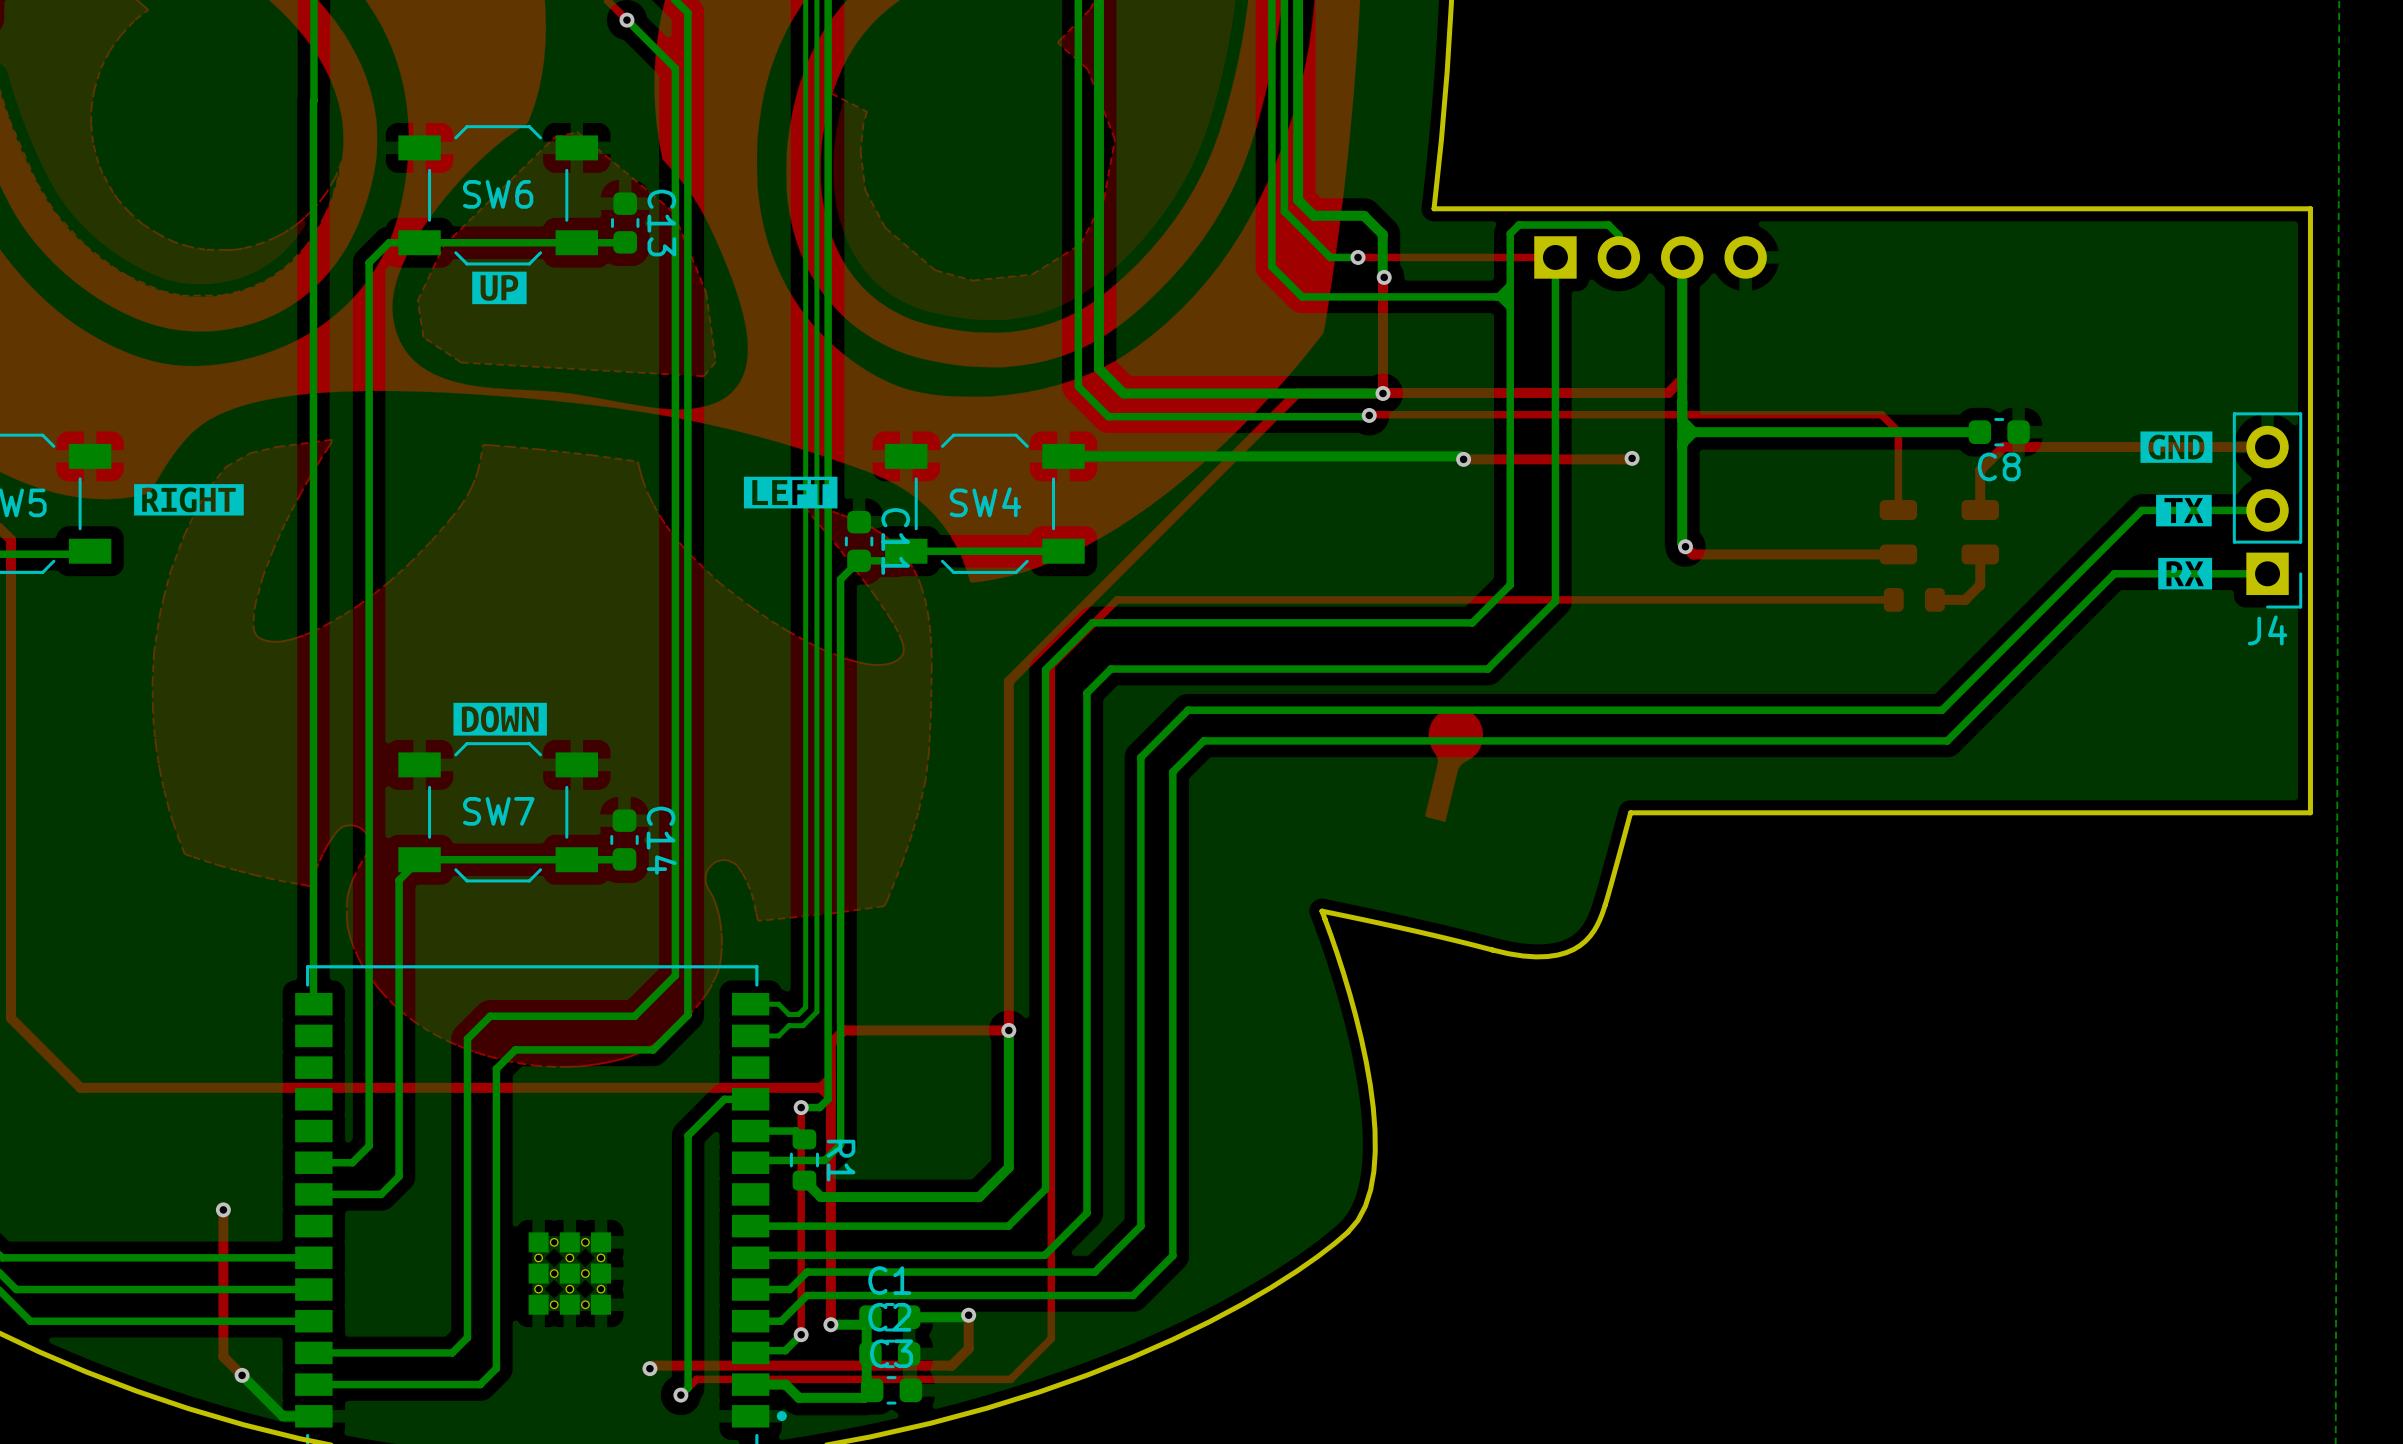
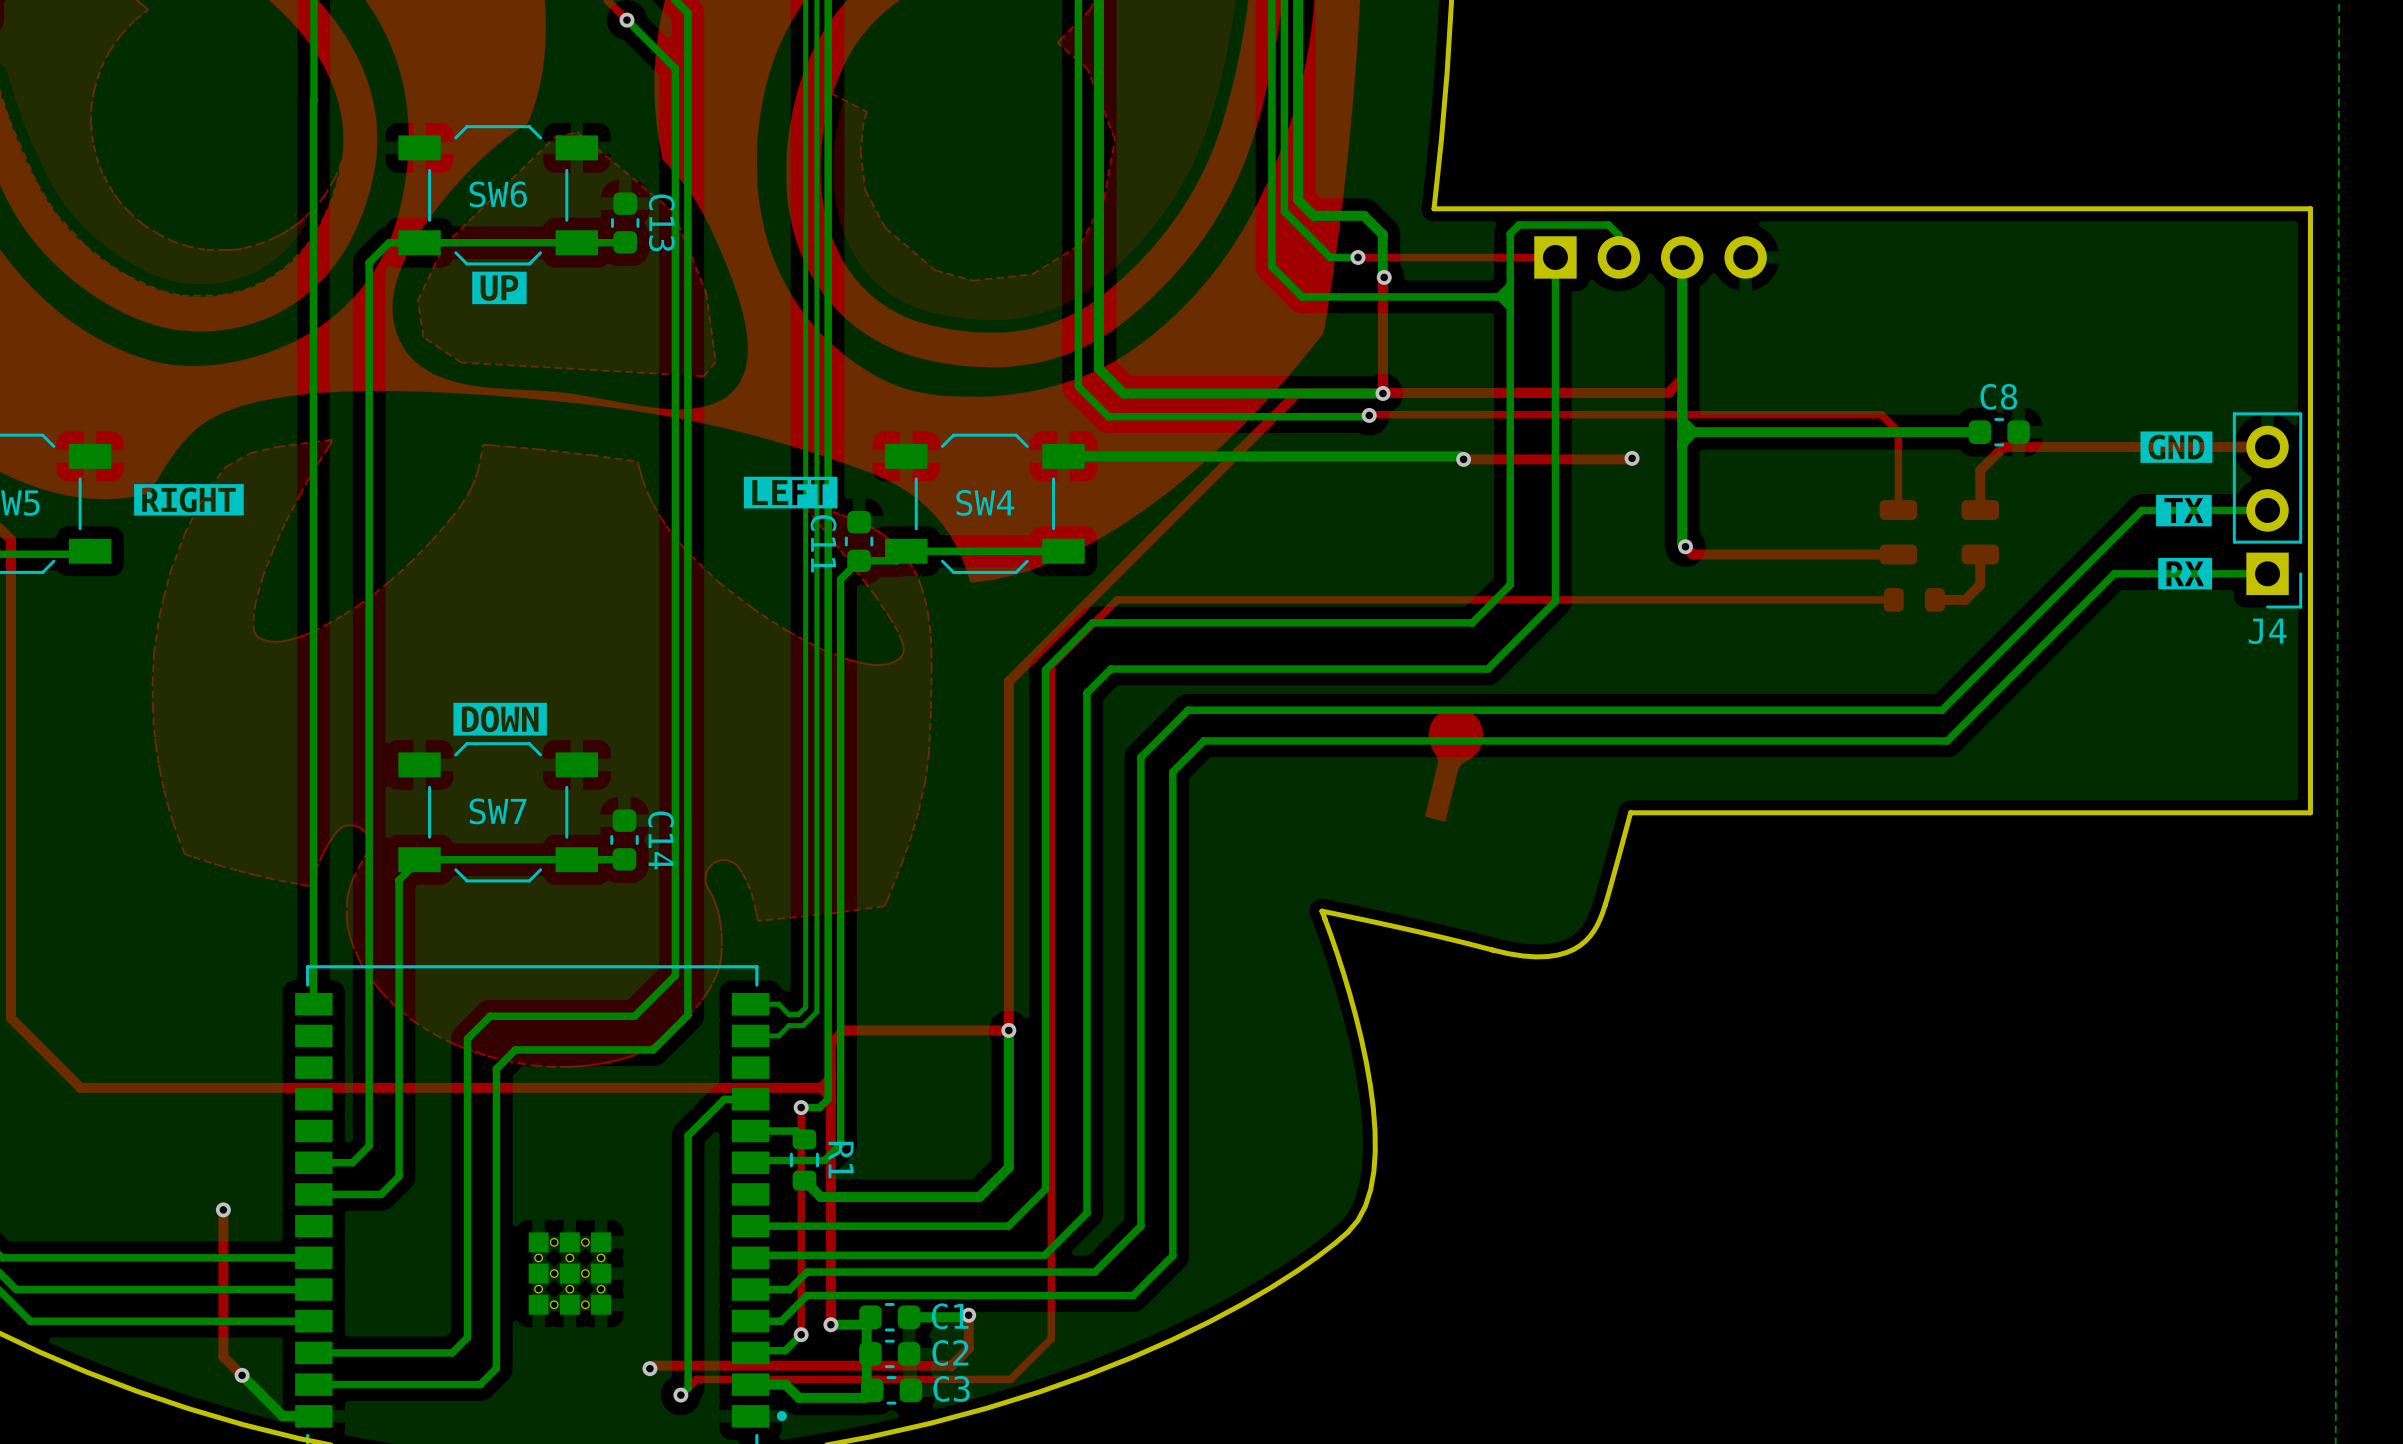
C8 name position: C8 (1999, 466) -> C8 (1998, 396)
C11 name position: C11 (895, 541) -> C11 (823, 543)
C1 name position: C1 (889, 1280) -> C1 (950, 1316)
C2 name position: C2 (889, 1317) -> C2 (950, 1353)
C3 name position: C3 (891, 1353) -> C3 (951, 1388)

